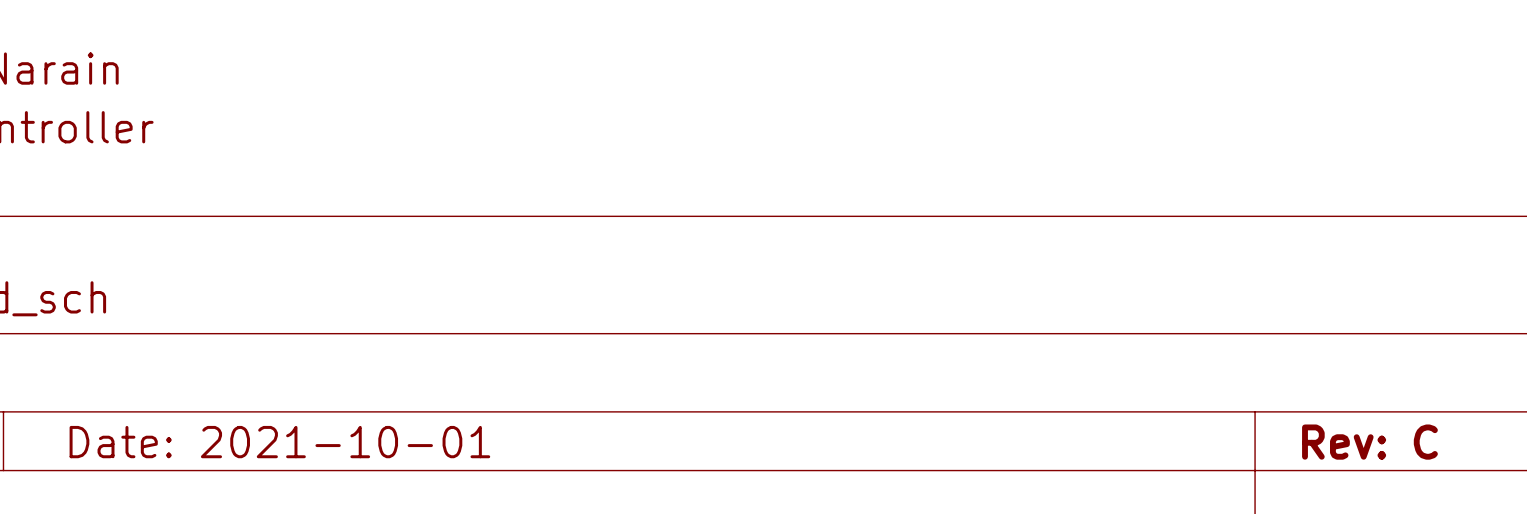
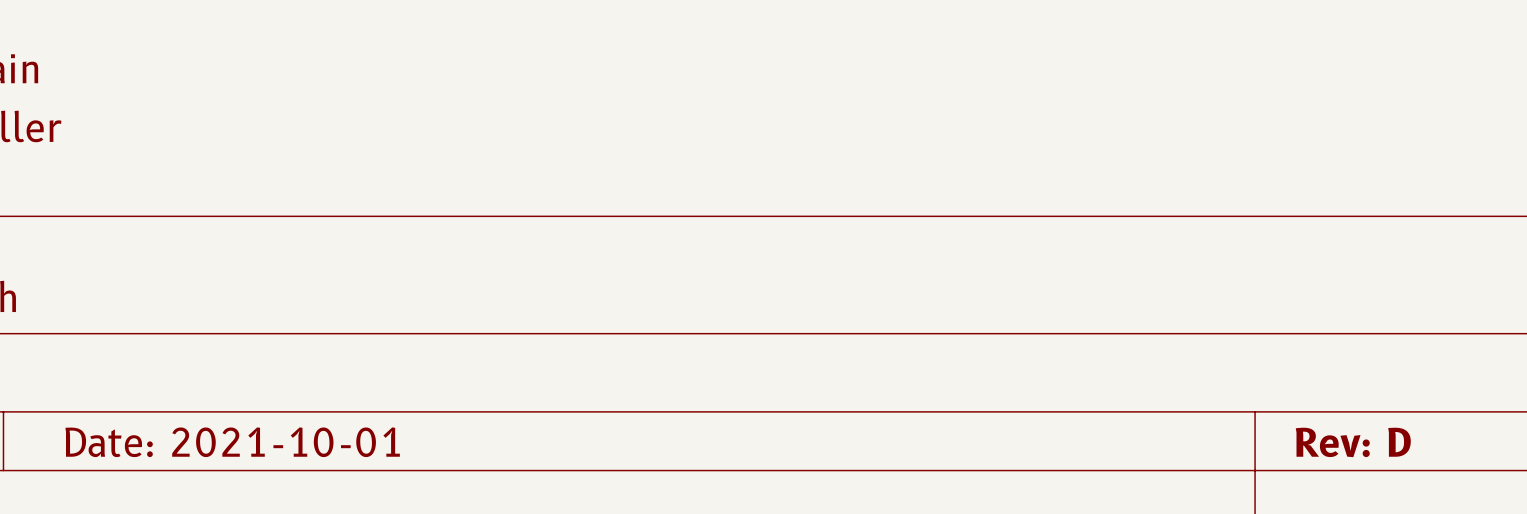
title block: Rev: C (1369, 442) -> Rev: D (1353, 442)

